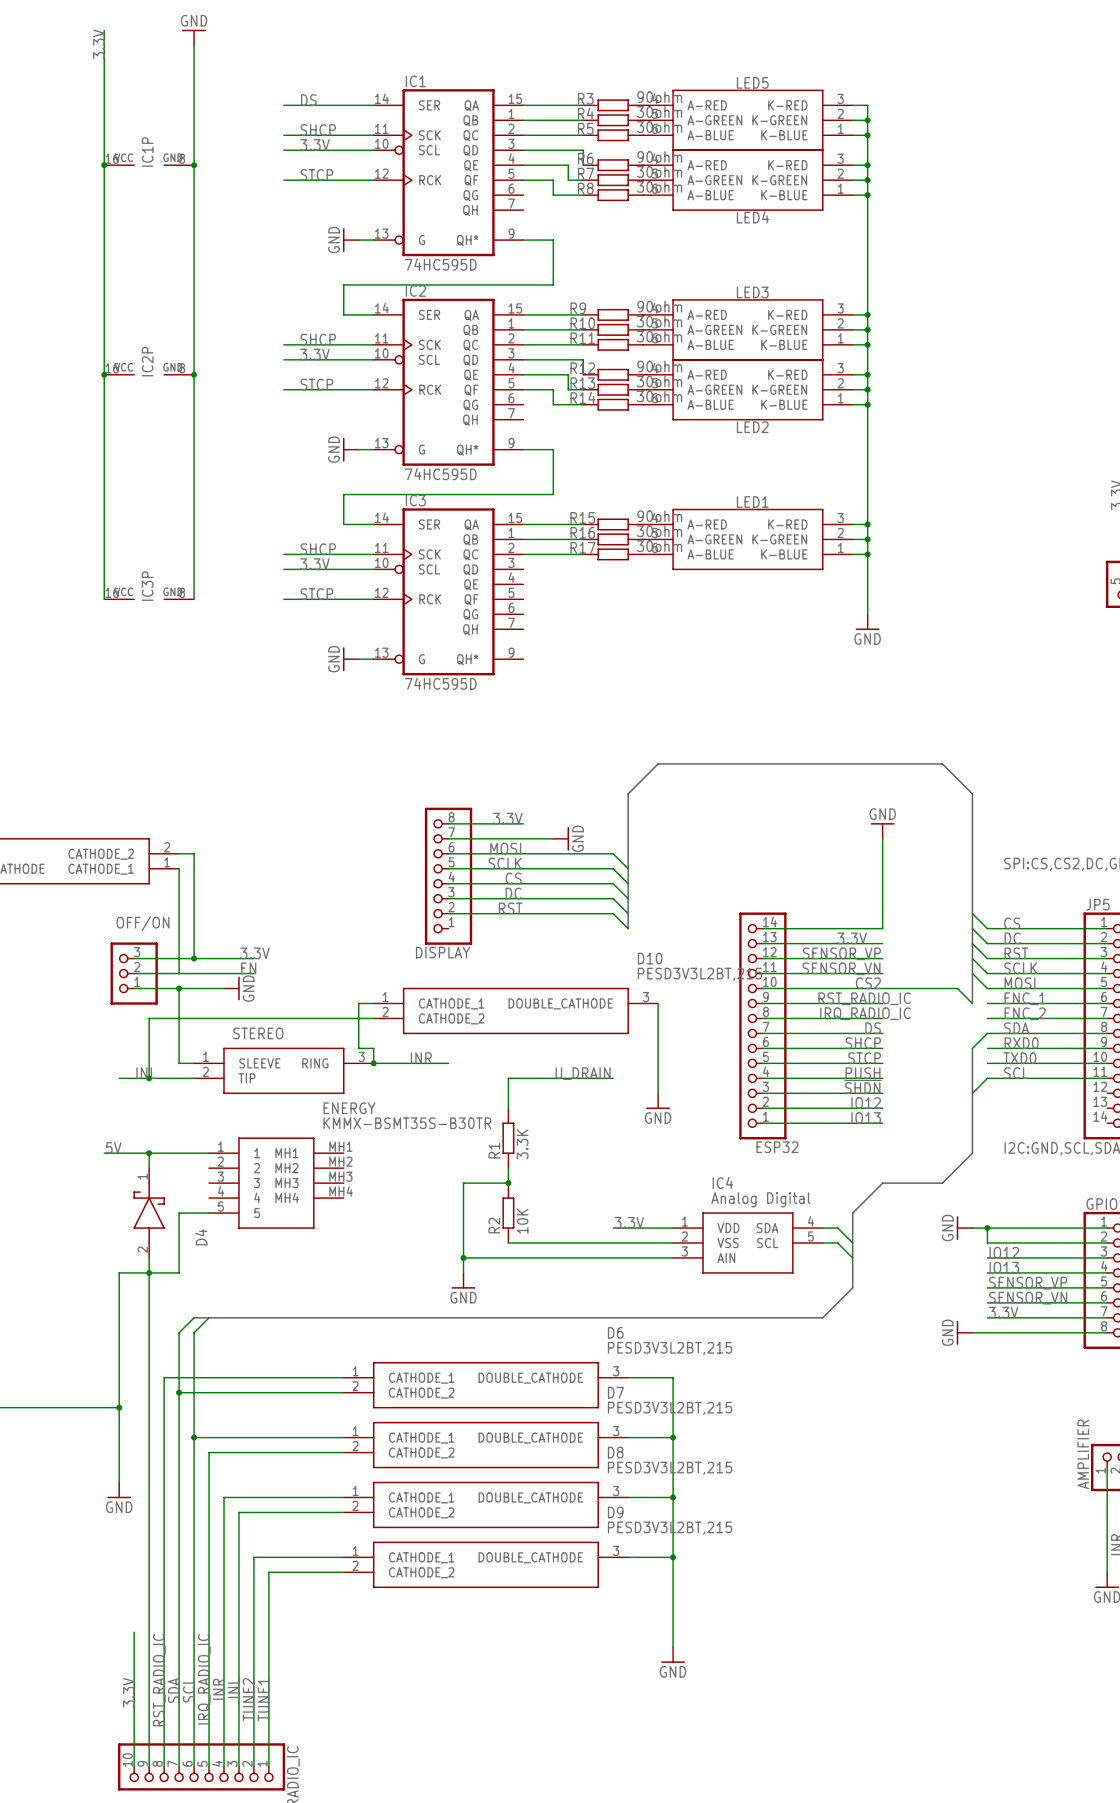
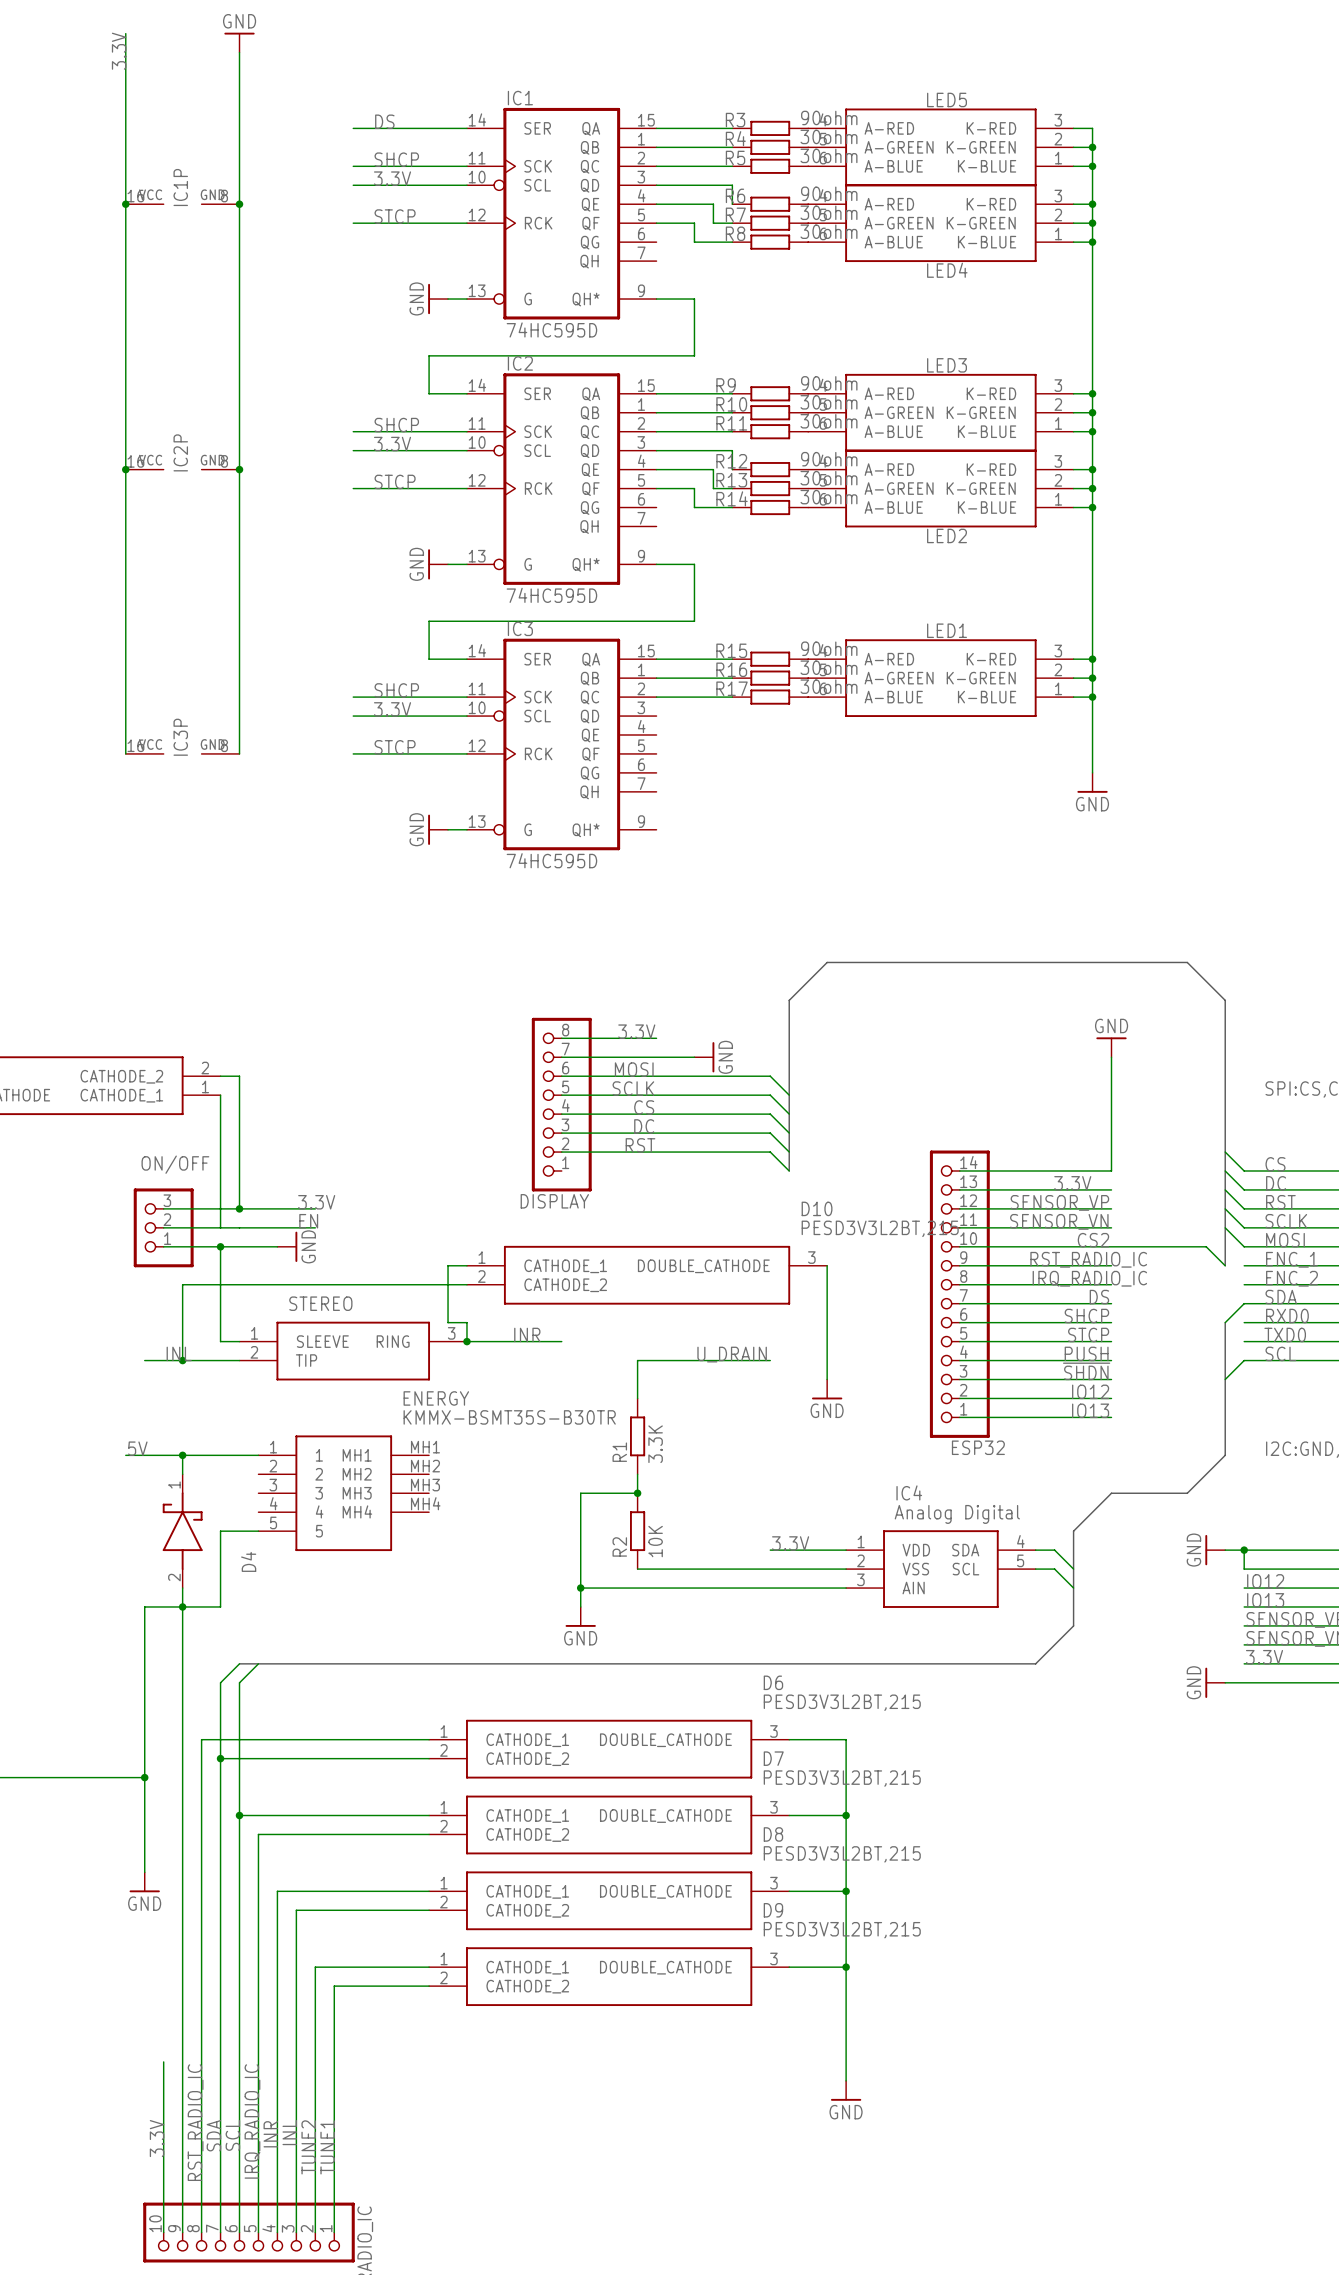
OFF/ON name: OFF/ON (142, 923) -> ON/OFF (175, 1164)

